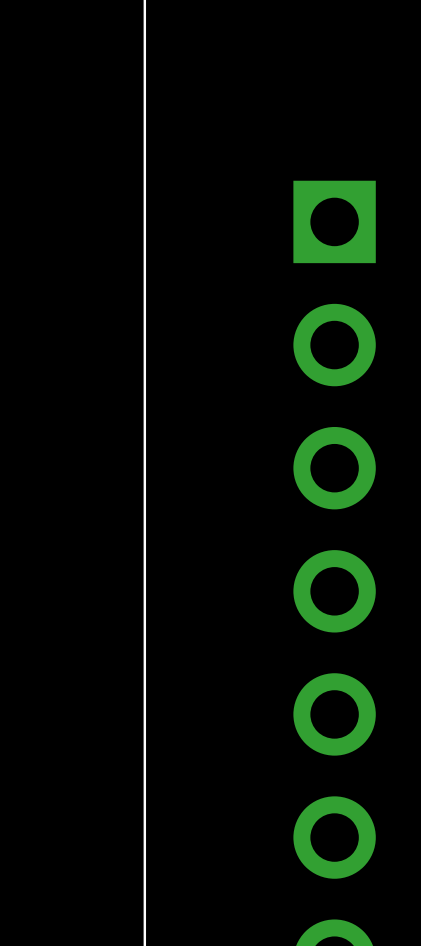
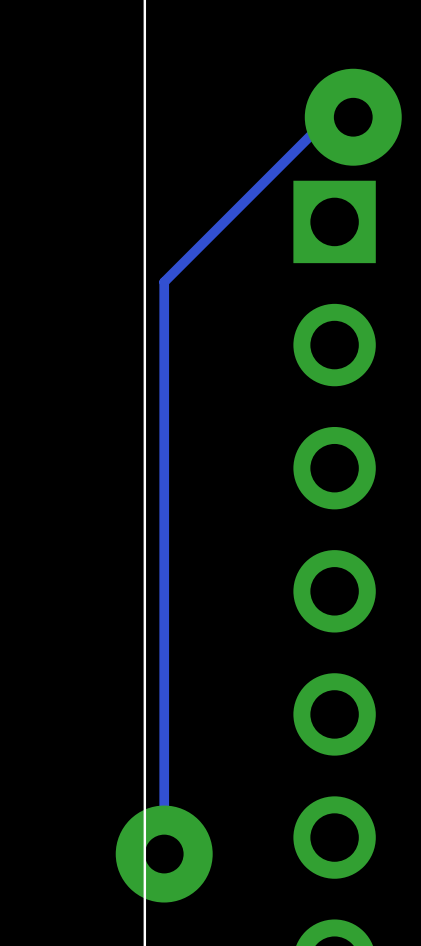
track: none -> (353, 117) (329, 117) (164, 282) (164, 854)
via: none -> (353, 117)
via: none -> (164, 854)

